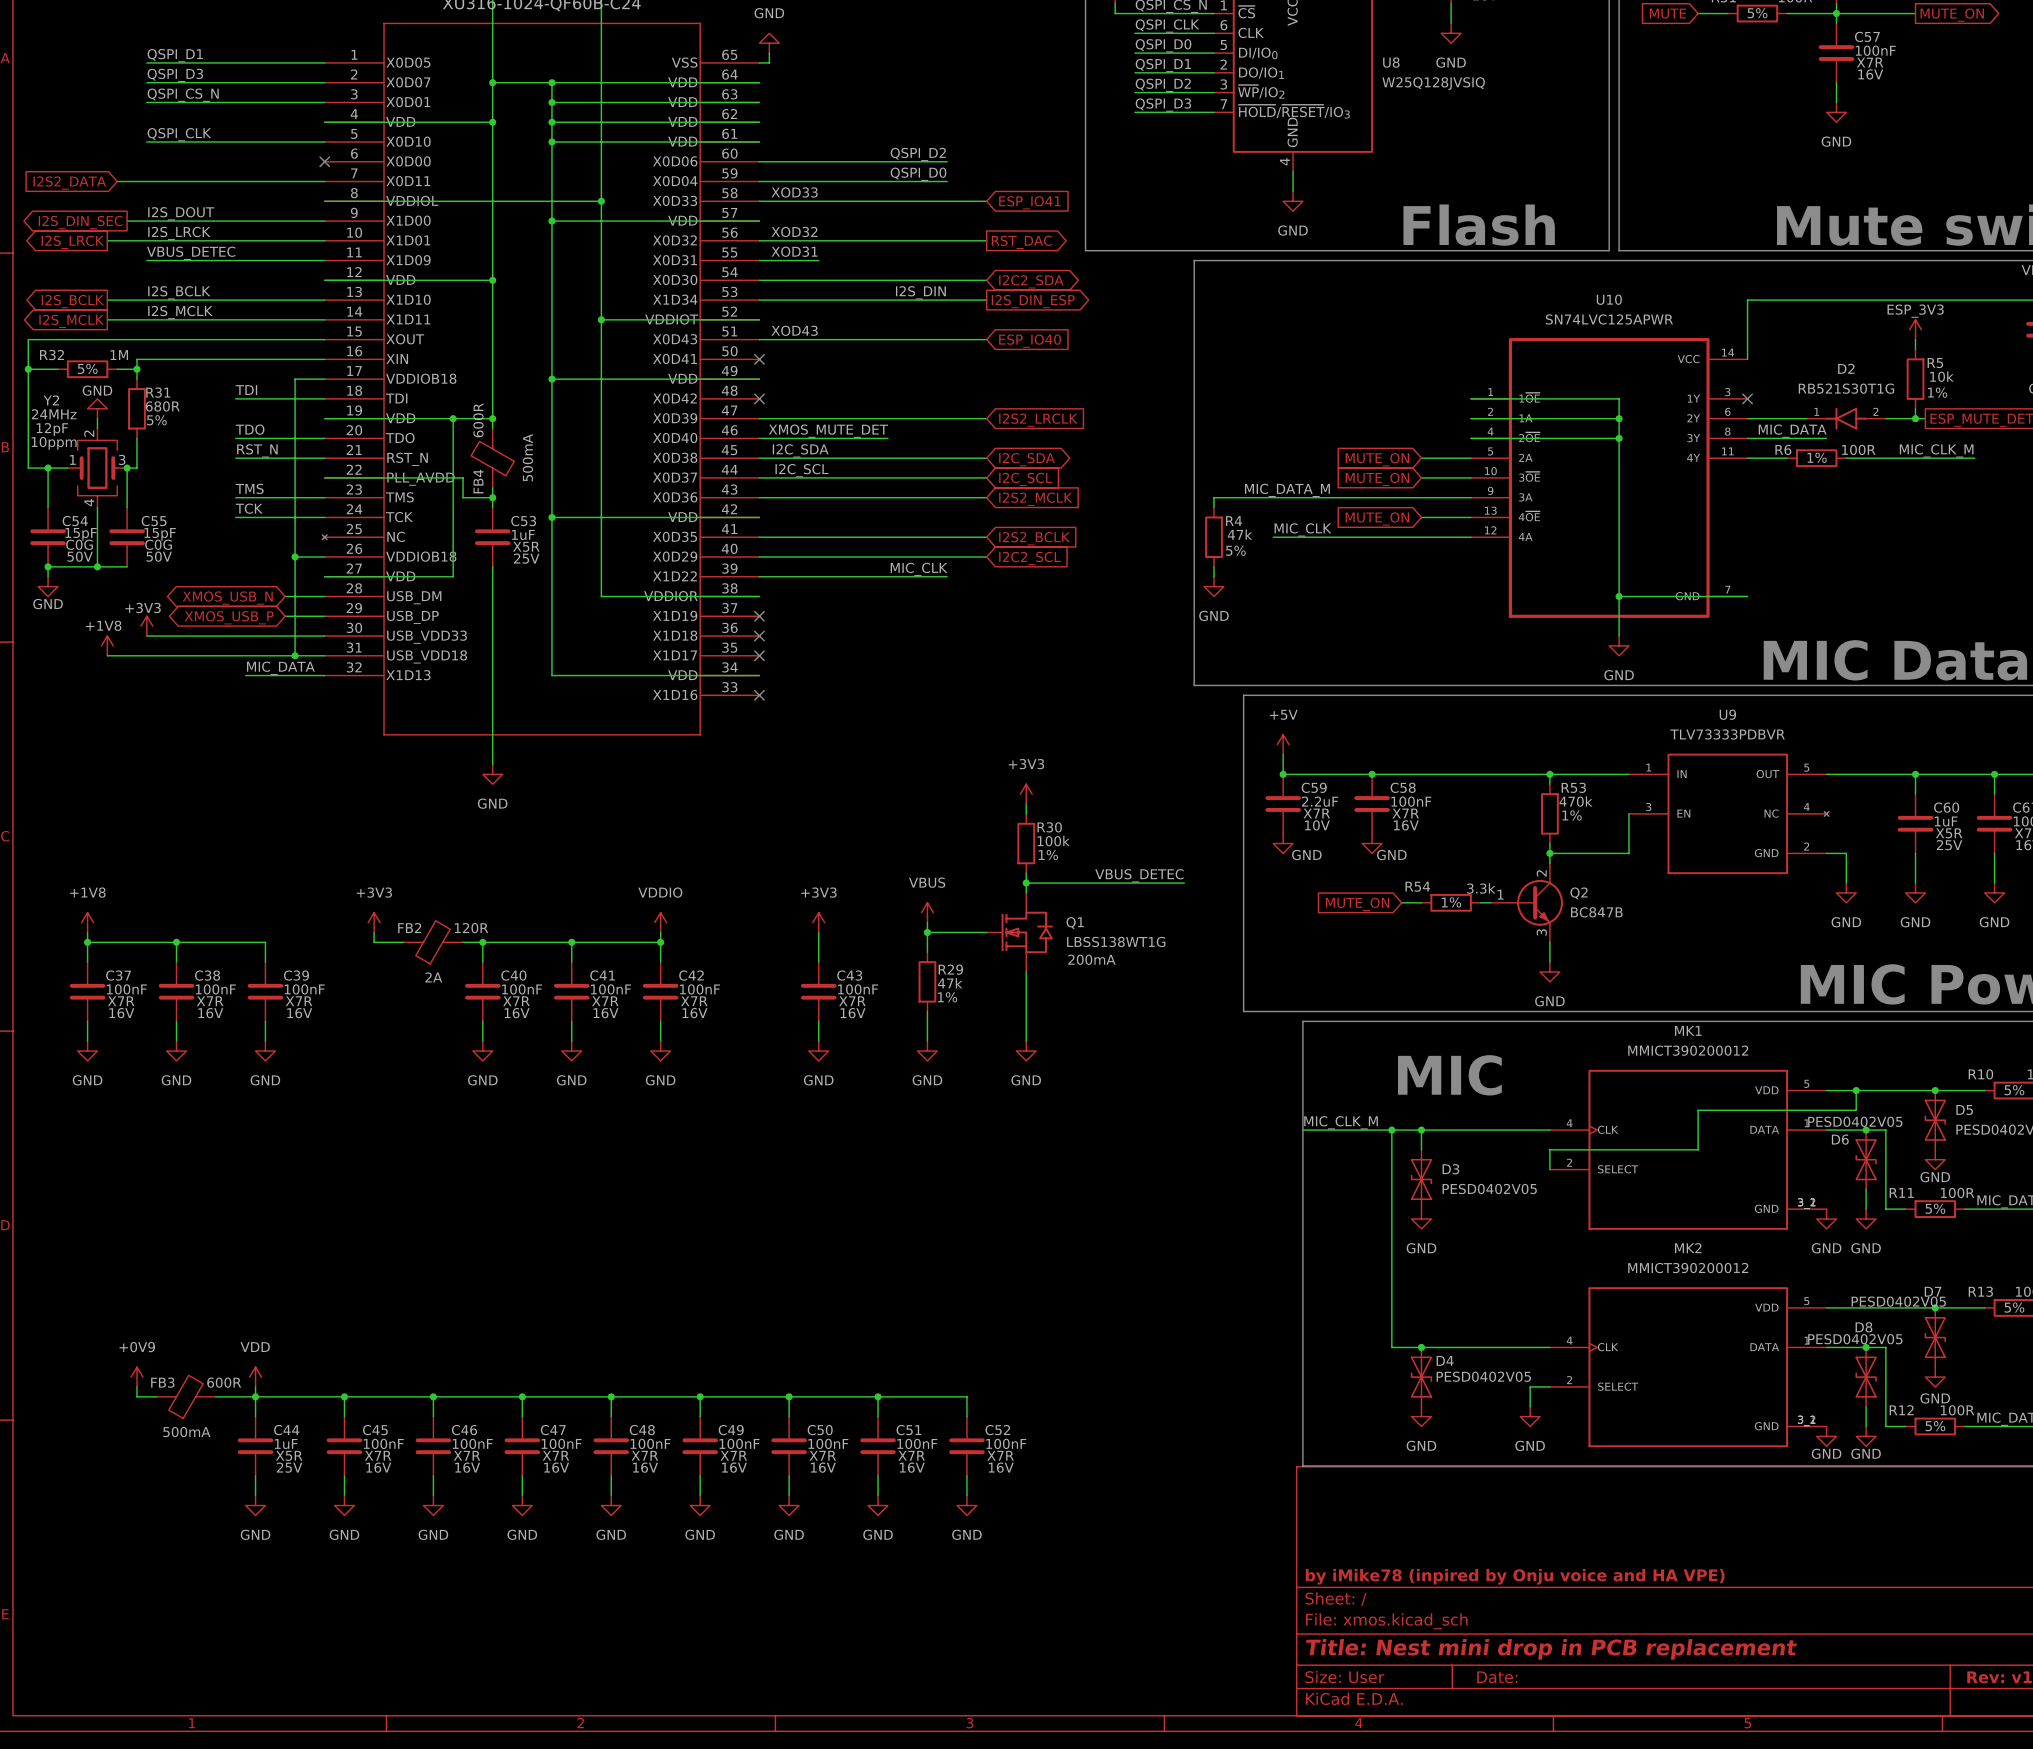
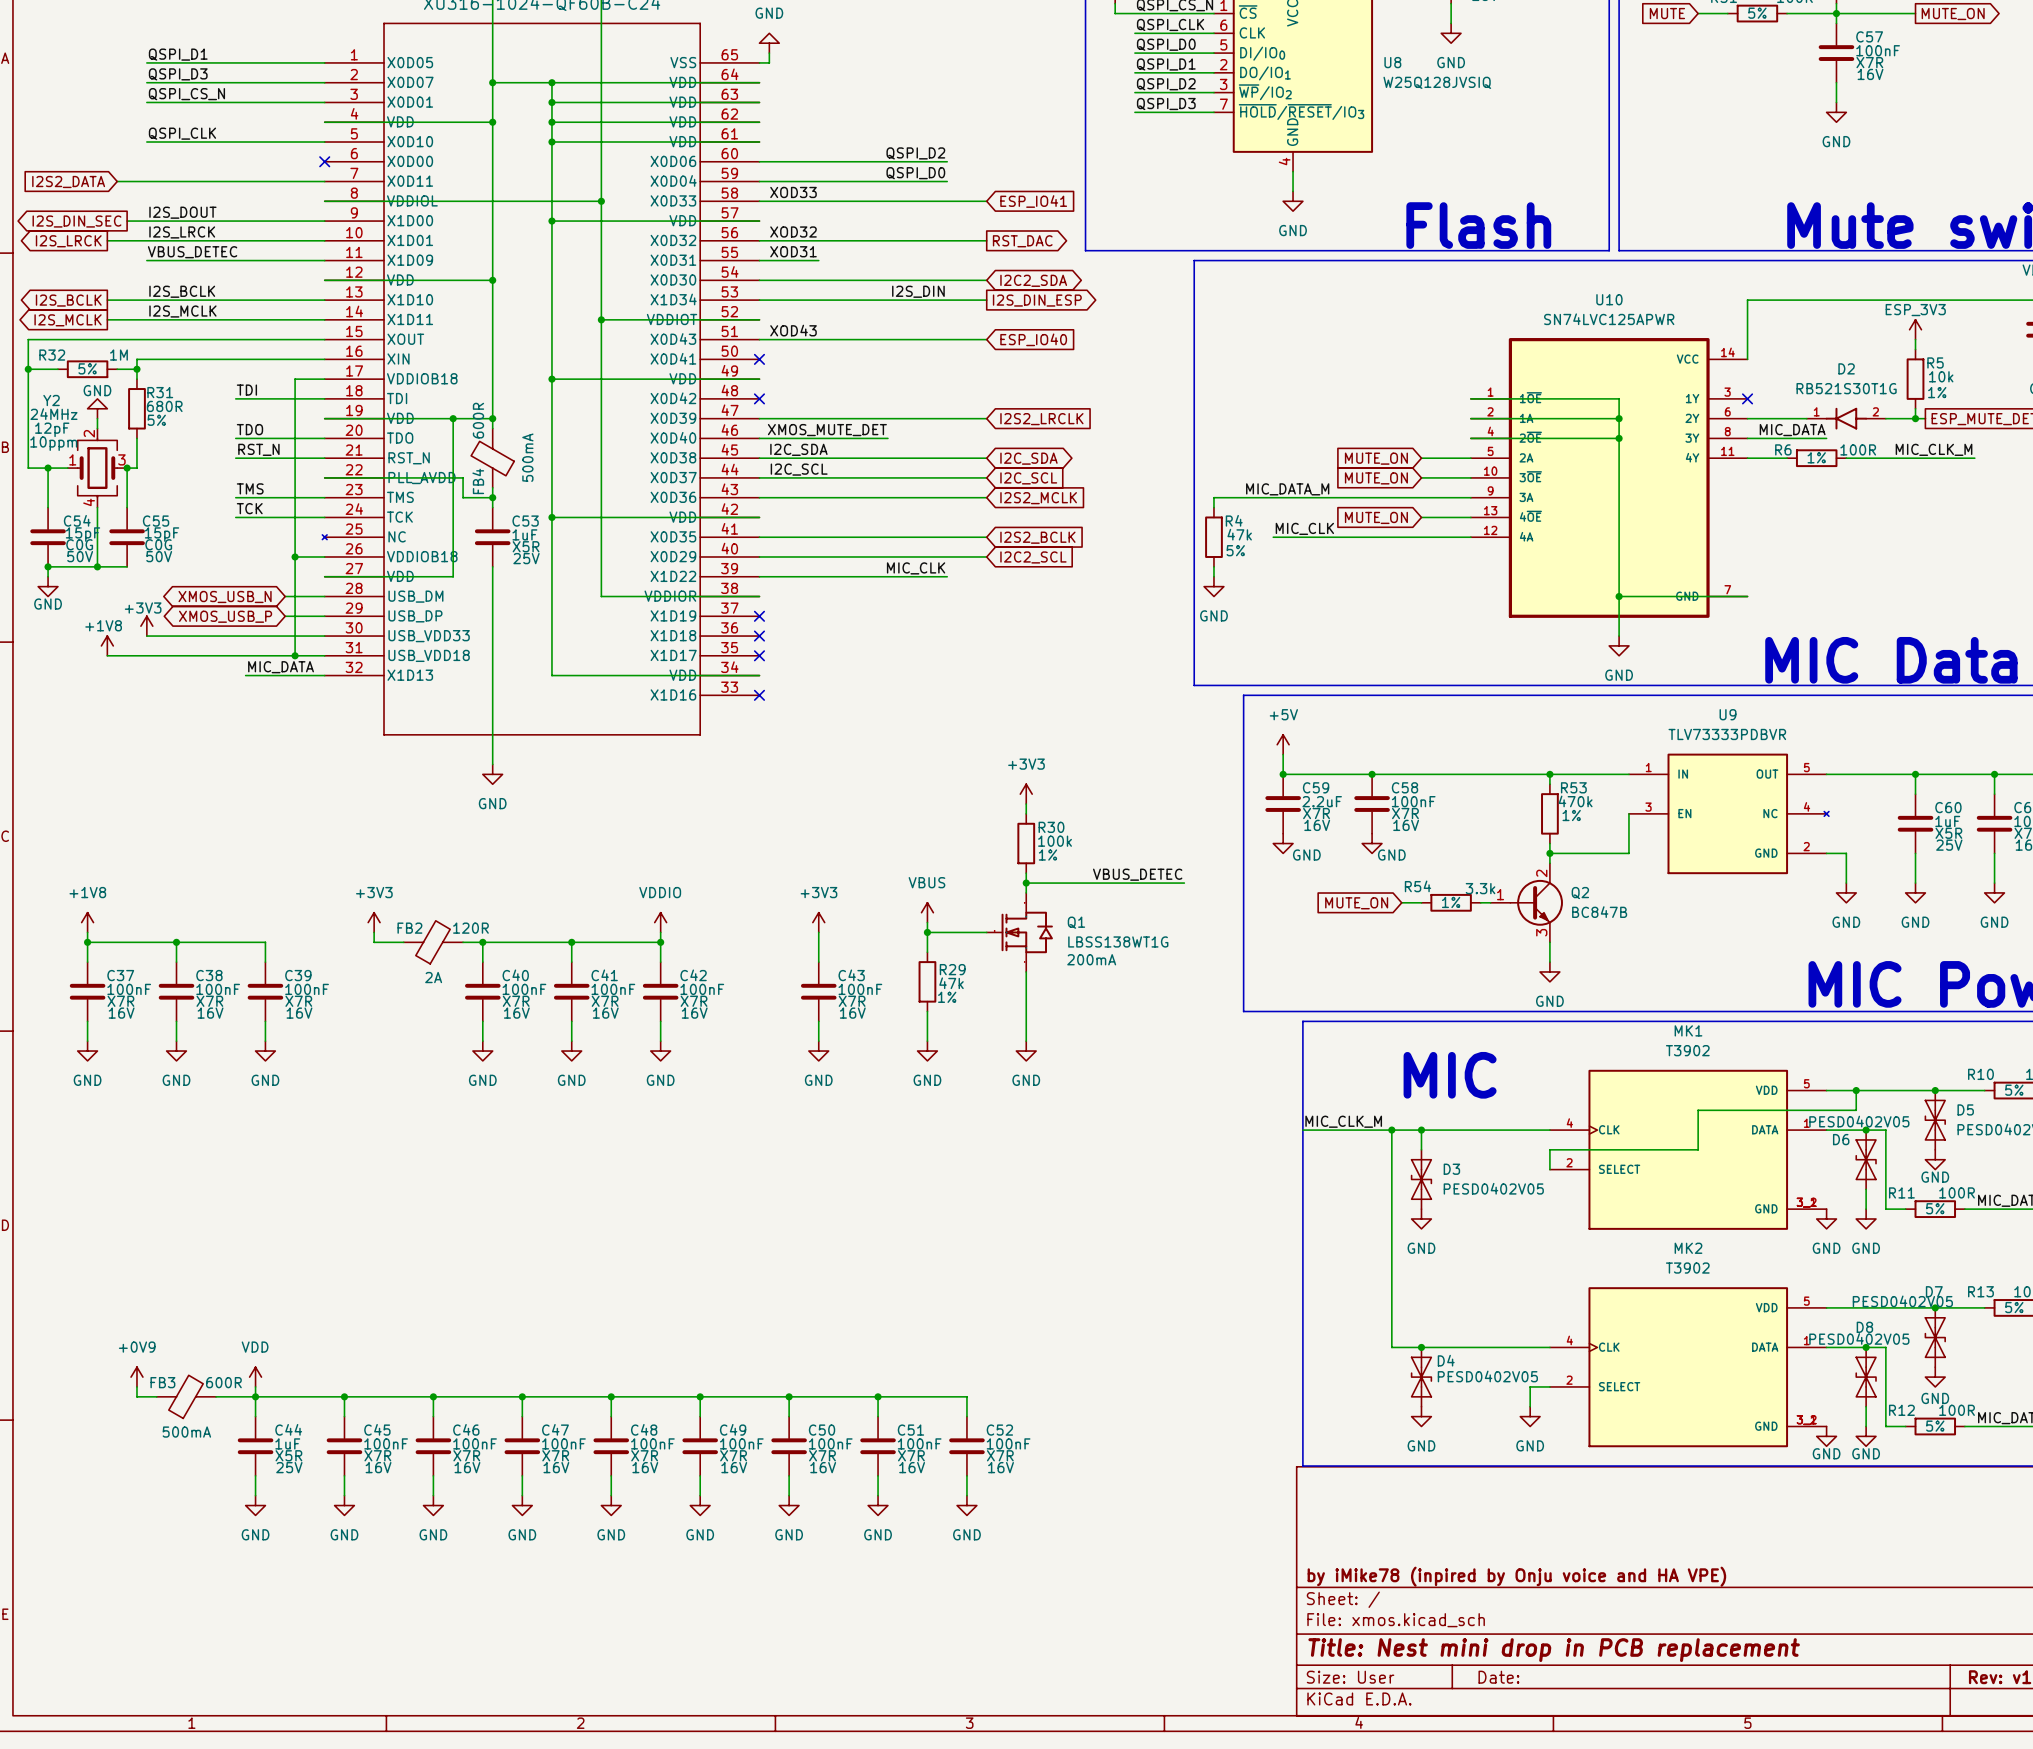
C59 text: 10V (1317, 825) -> 16V (1317, 825)
MK1 value: MMICT390200012 (1688, 1050) -> T3902 (1687, 1050)
MK2 value: MMICT390200012 (1688, 1268) -> T3902 (1687, 1268)

